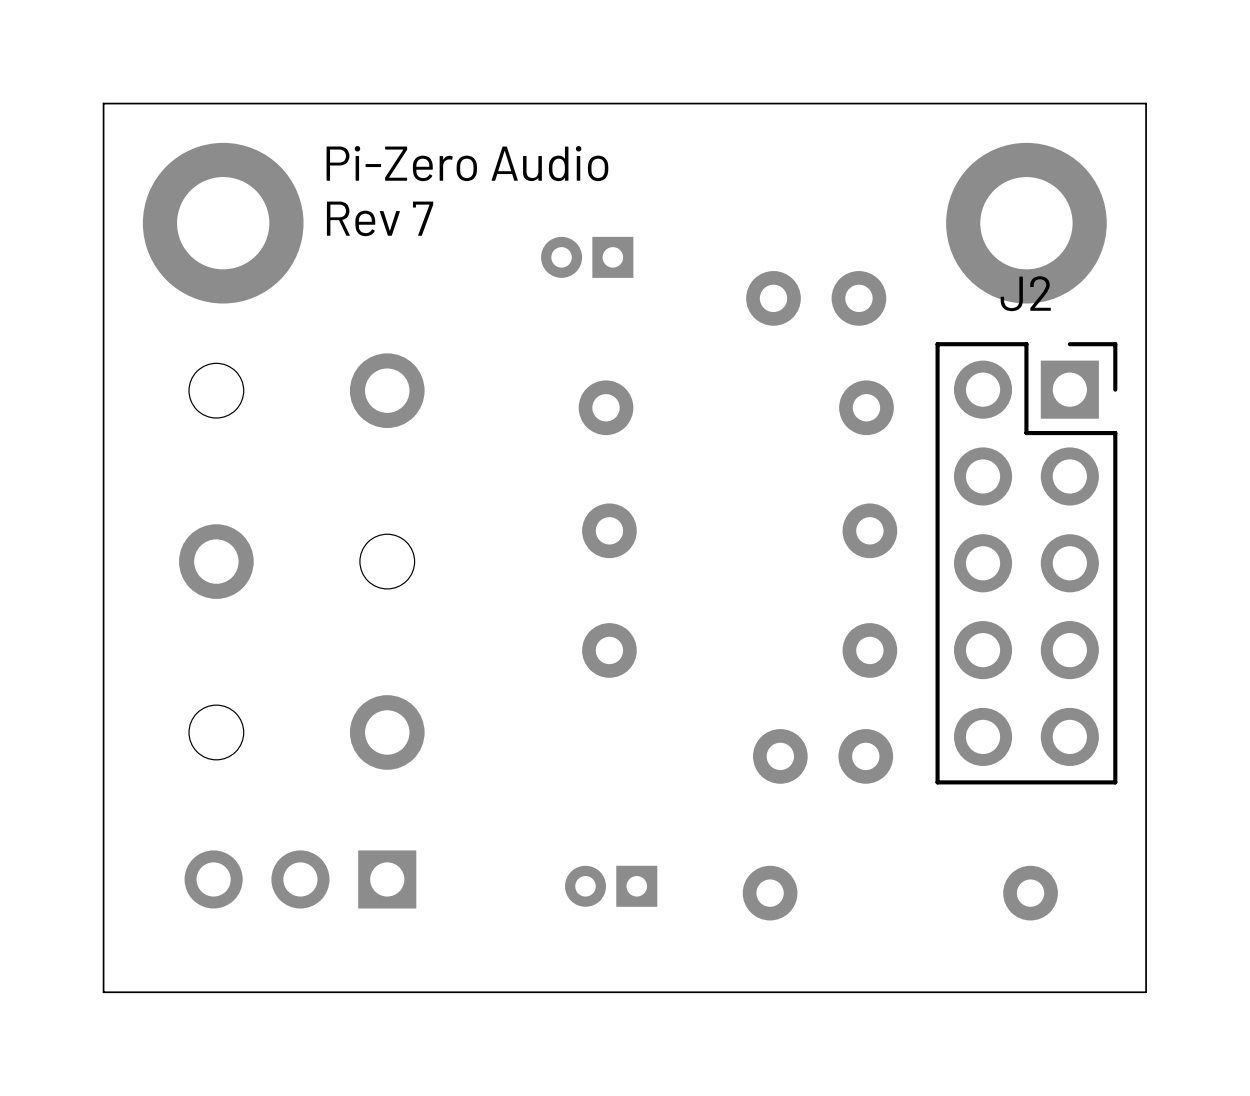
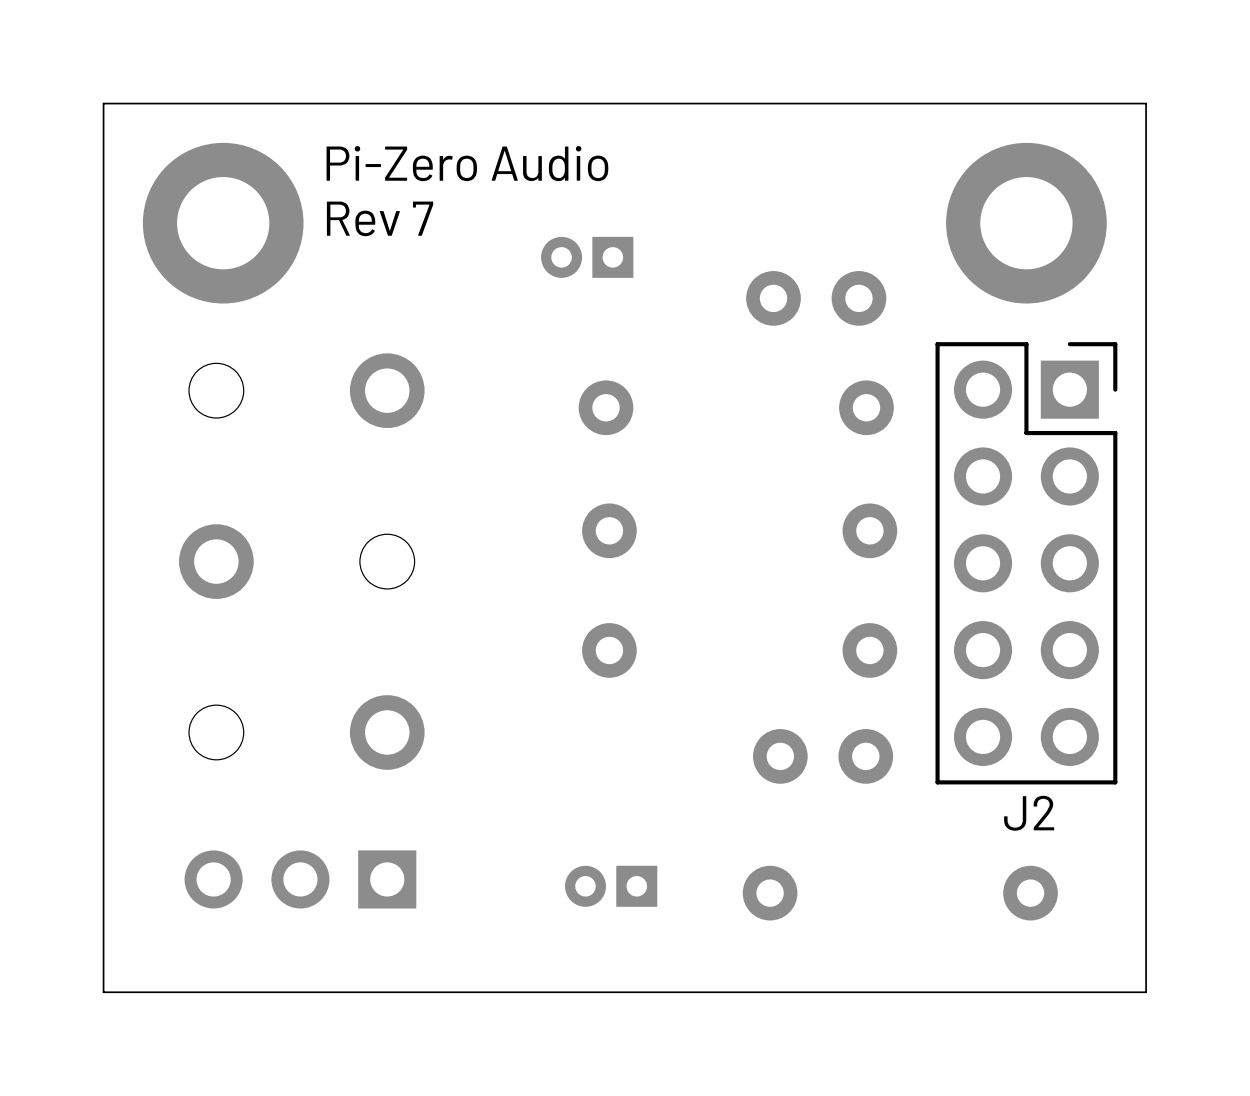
J2 name position: J2 (1025, 293) -> J2 (1029, 813)

